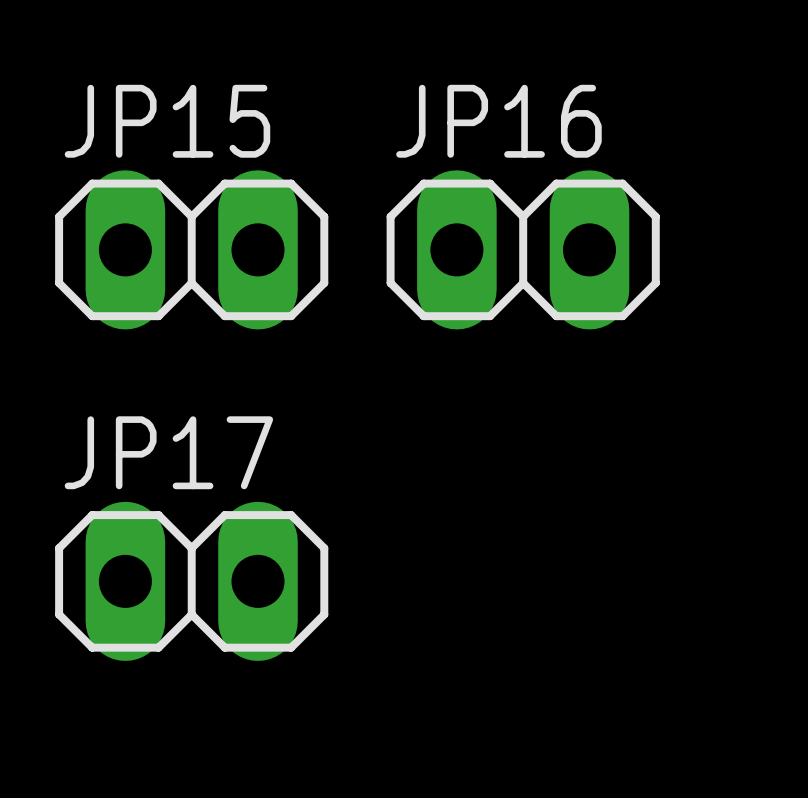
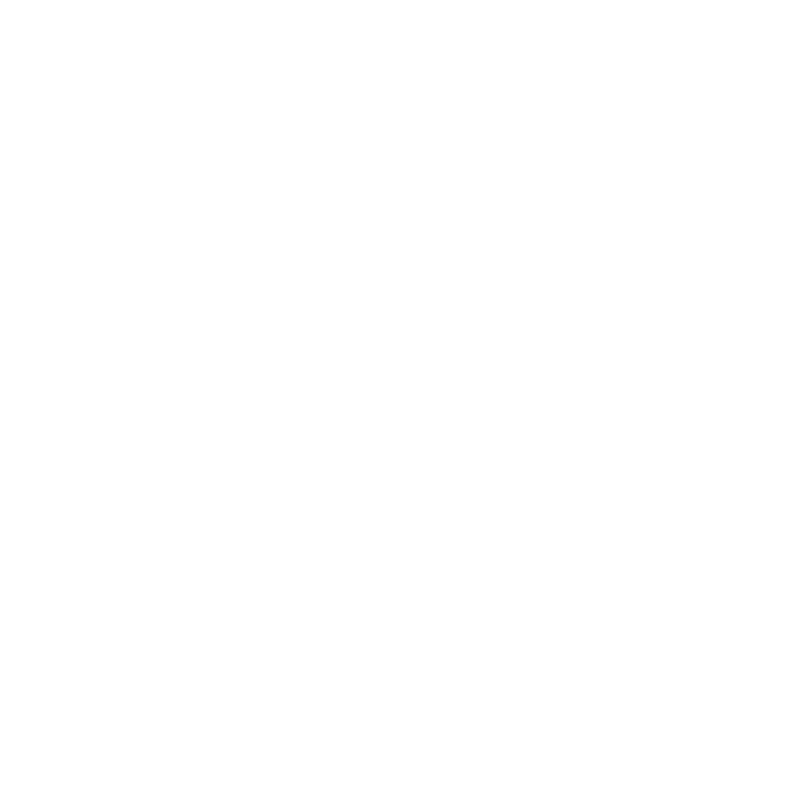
JP15: (191, 249) -> none
JP16: (523, 249) -> none
JP17: (191, 581) -> none

